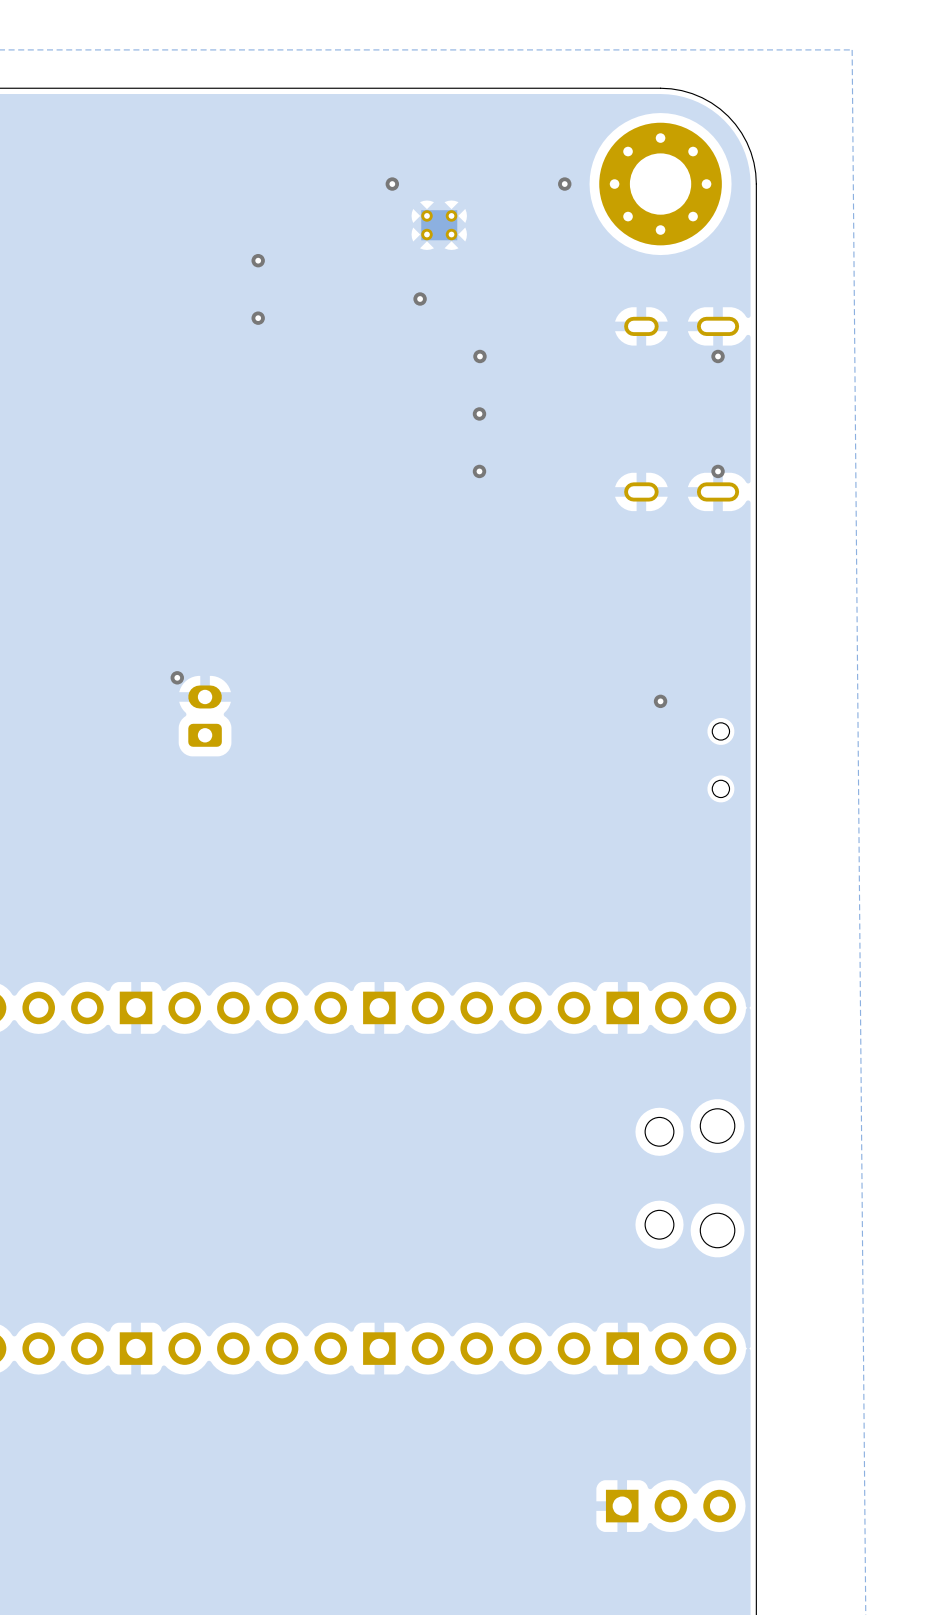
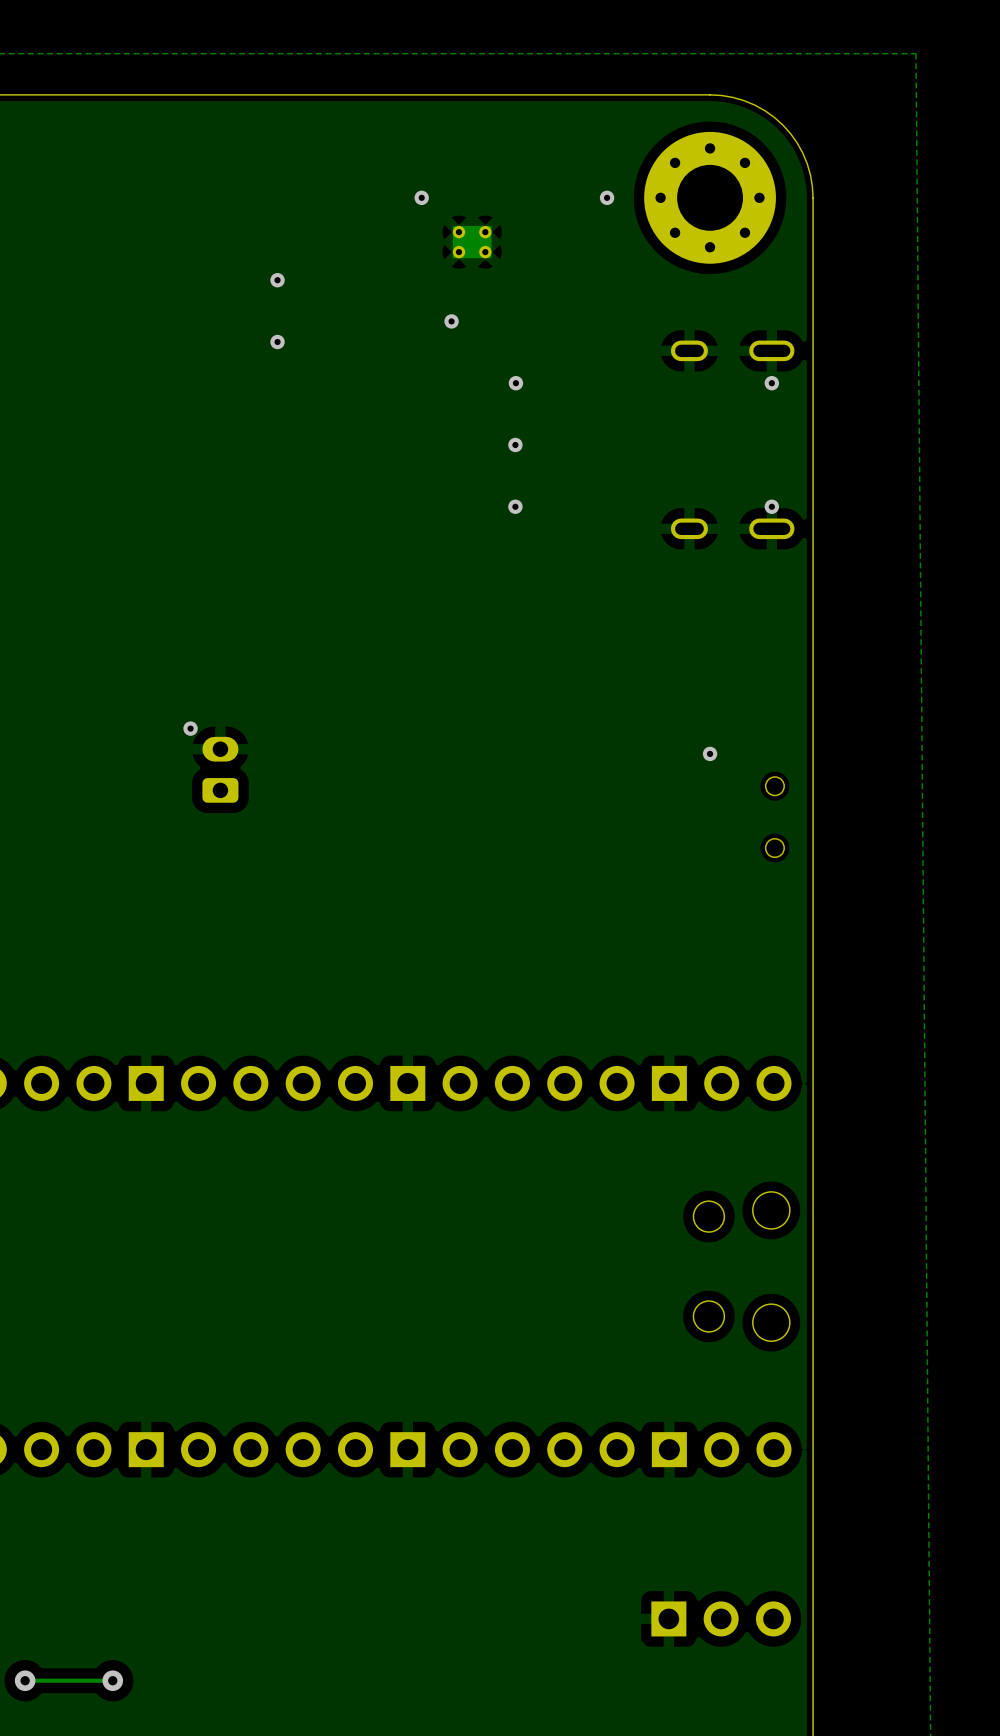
via: none -> (25, 1680)
track: none -> (112, 1680) (25, 1680)
via: none -> (112, 1680)

